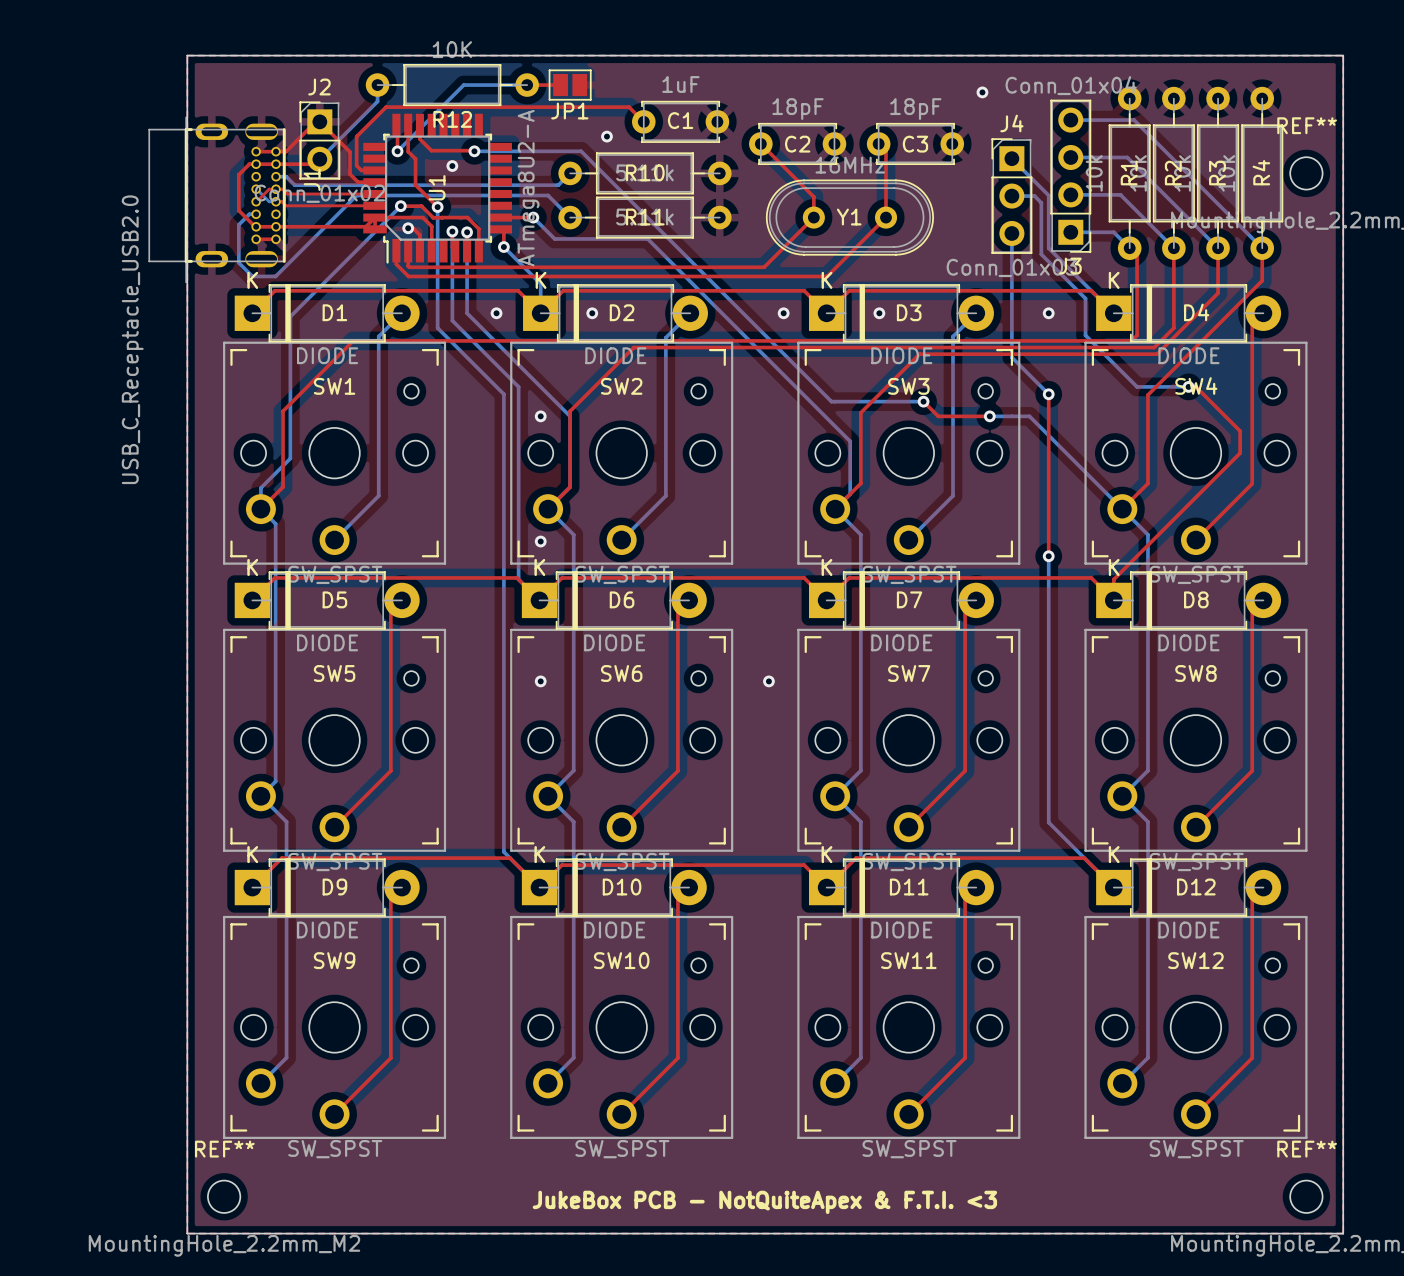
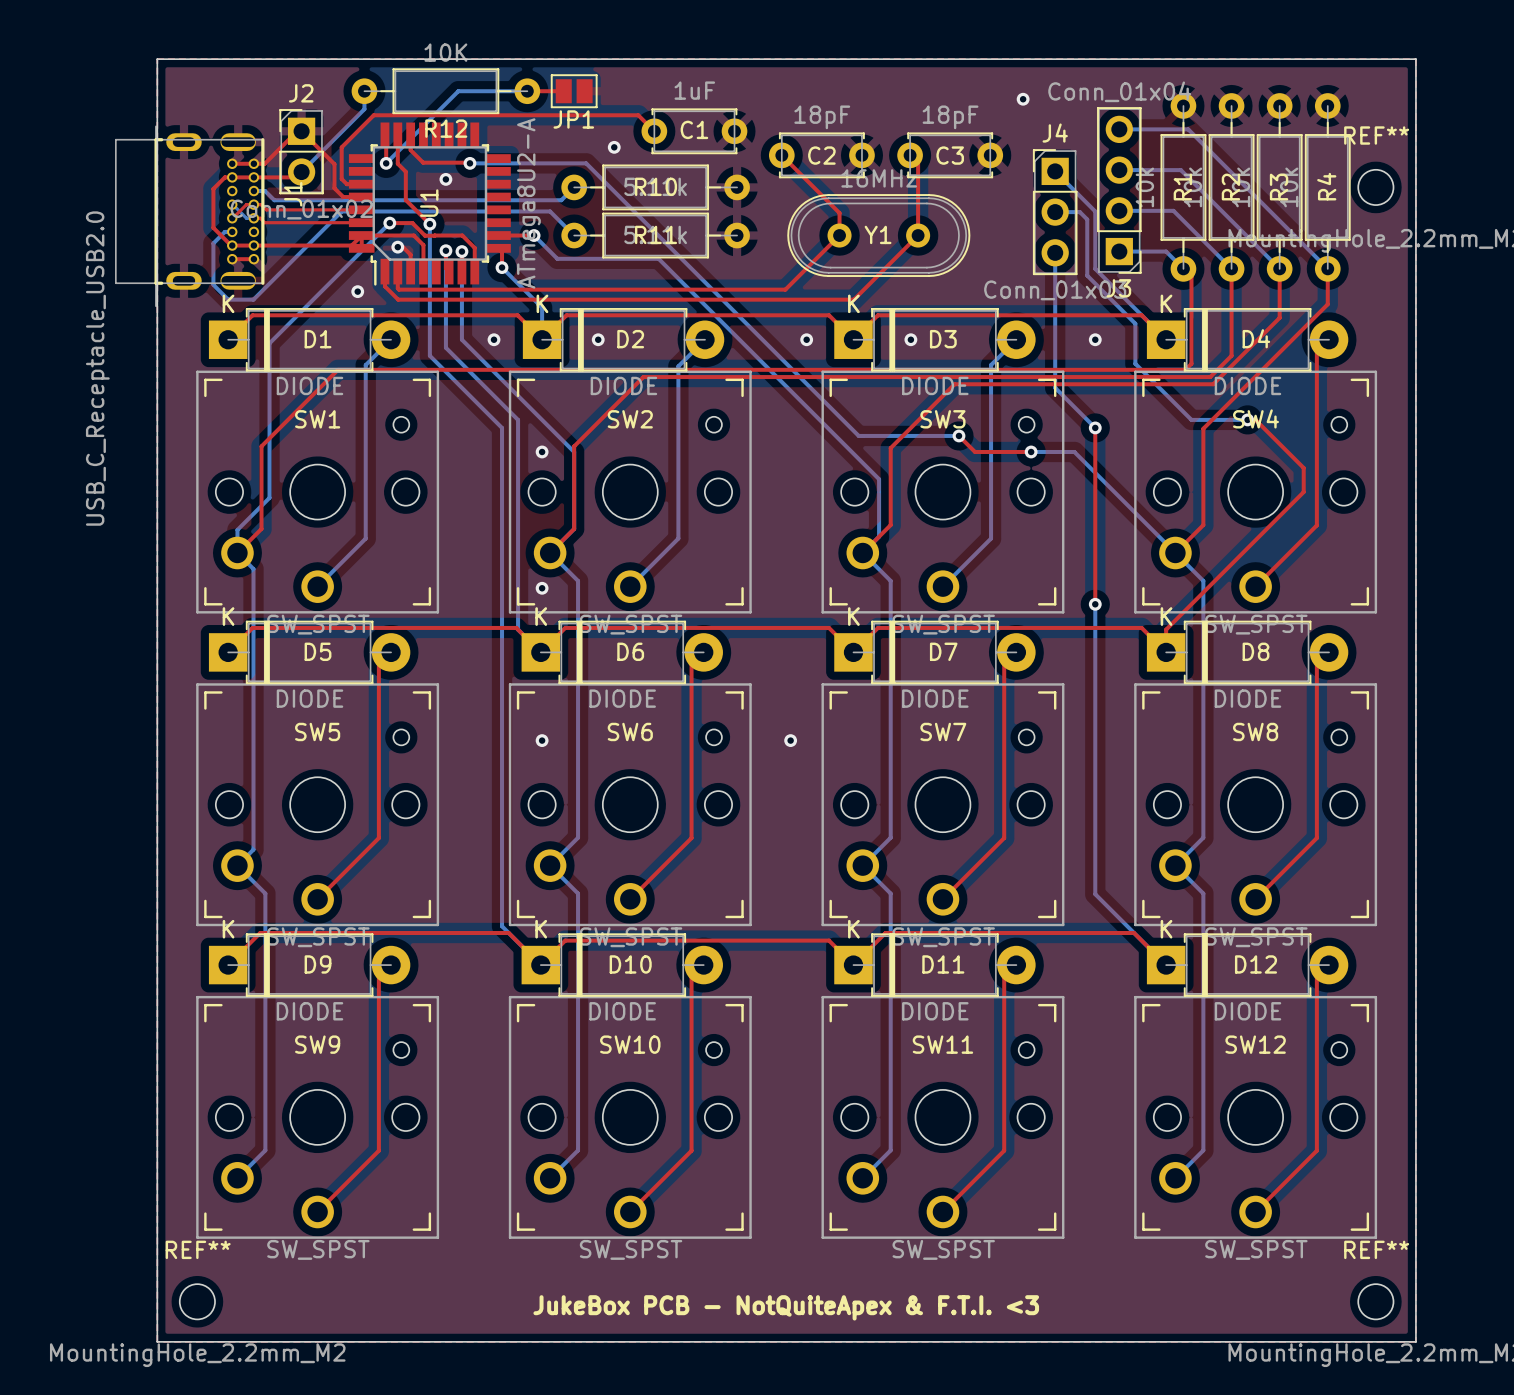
via: none -> (357, 291)

